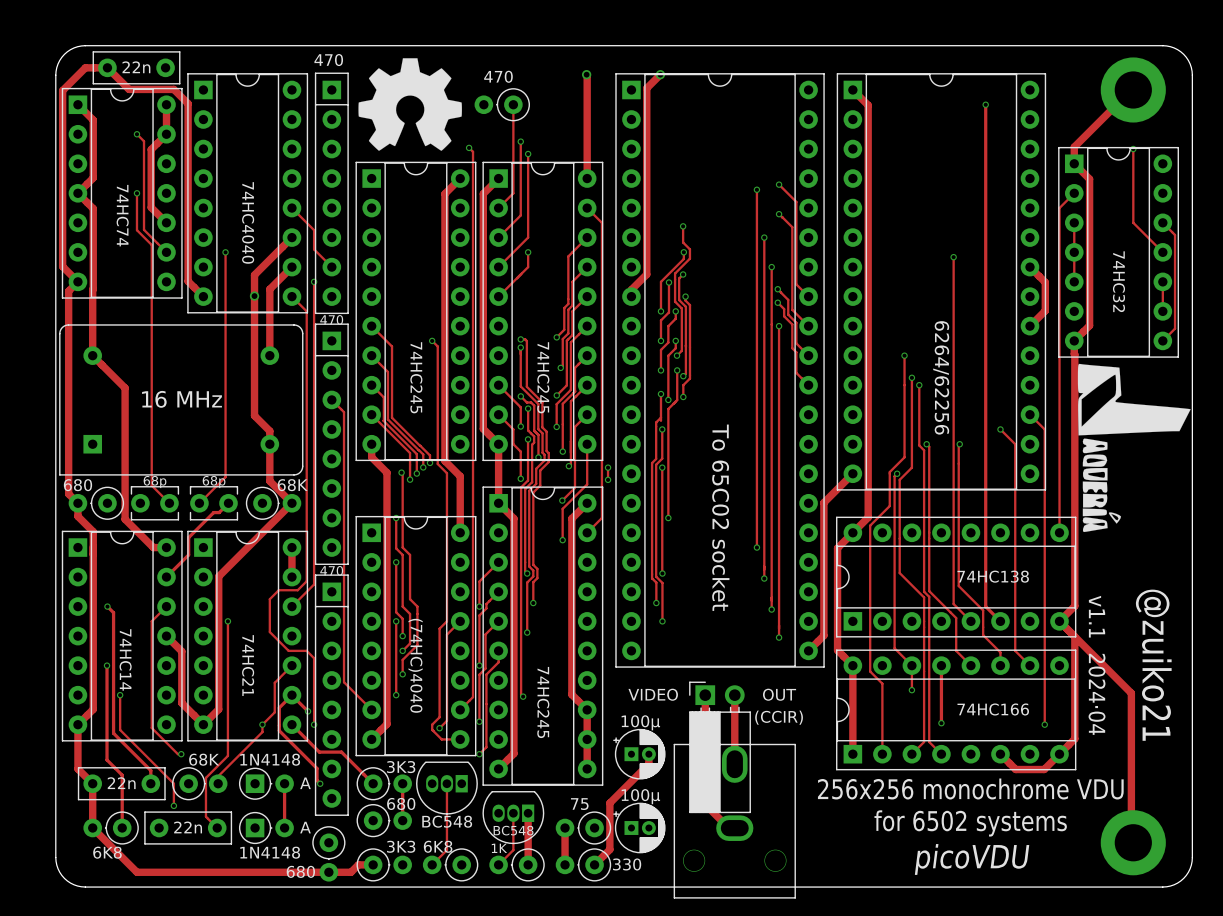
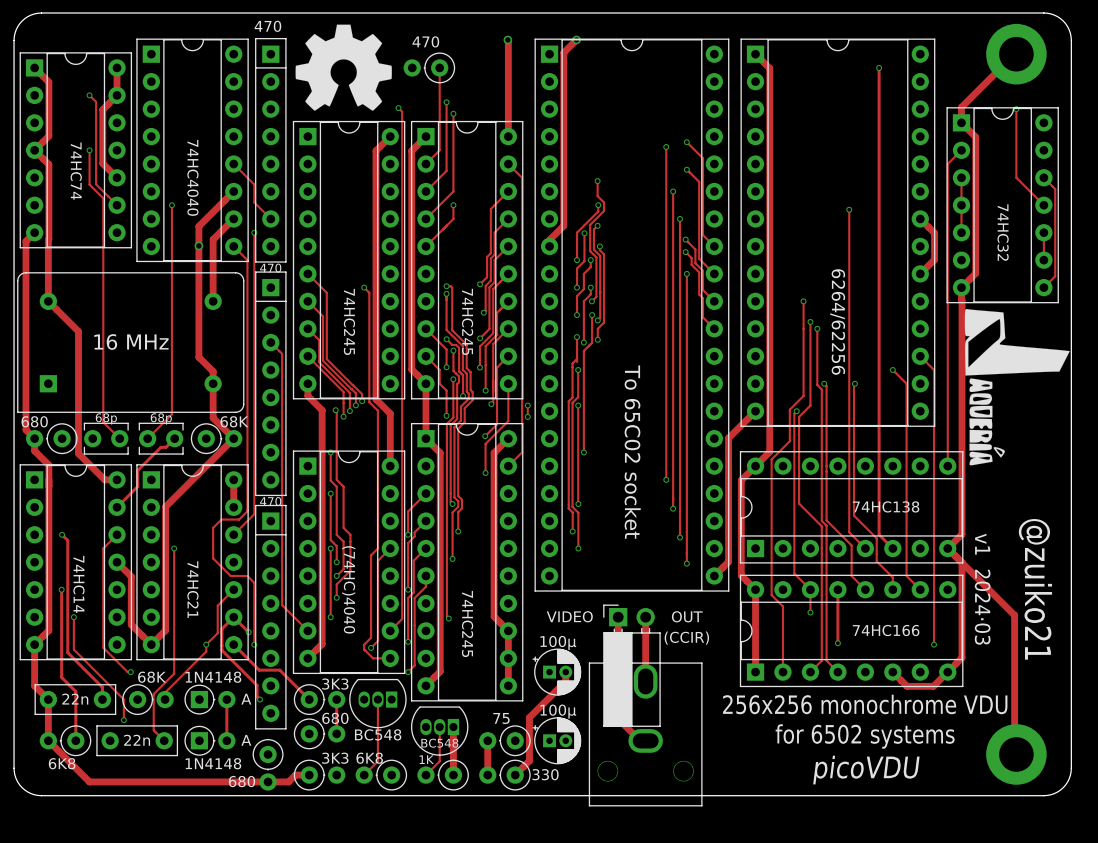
part: 22n (136, 67) -> none
track: (77, 281) (62, 266) (62, 90) (85, 67) (107, 67) (129, 89) (173, 89) (188, 103) (188, 281) (203, 296) -> none
text: v1.1 2024·04 (1097, 665) -> v1 2024·03 (982, 589)

